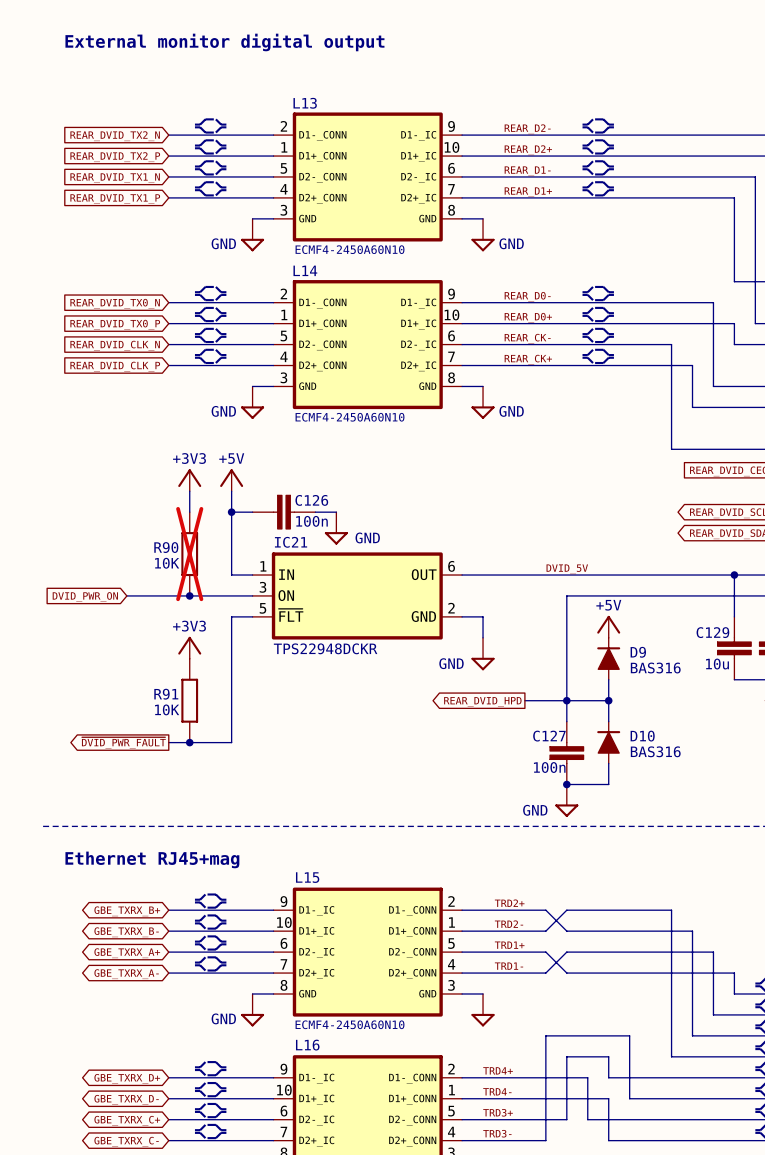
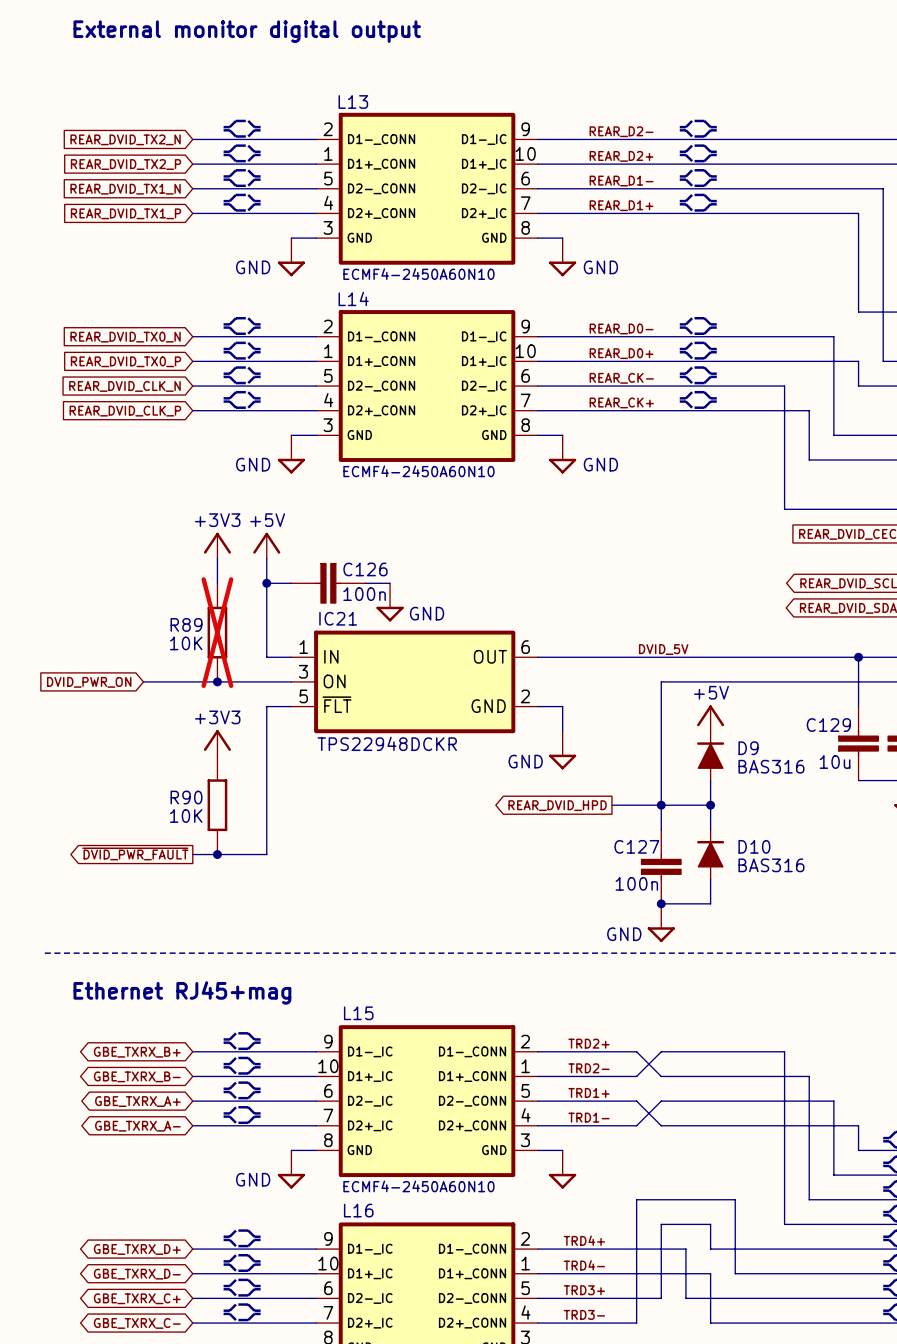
R90 name: R90 (166, 547) -> R89 (186, 624)
R91 name: R91 (166, 694) -> R90 (186, 797)

